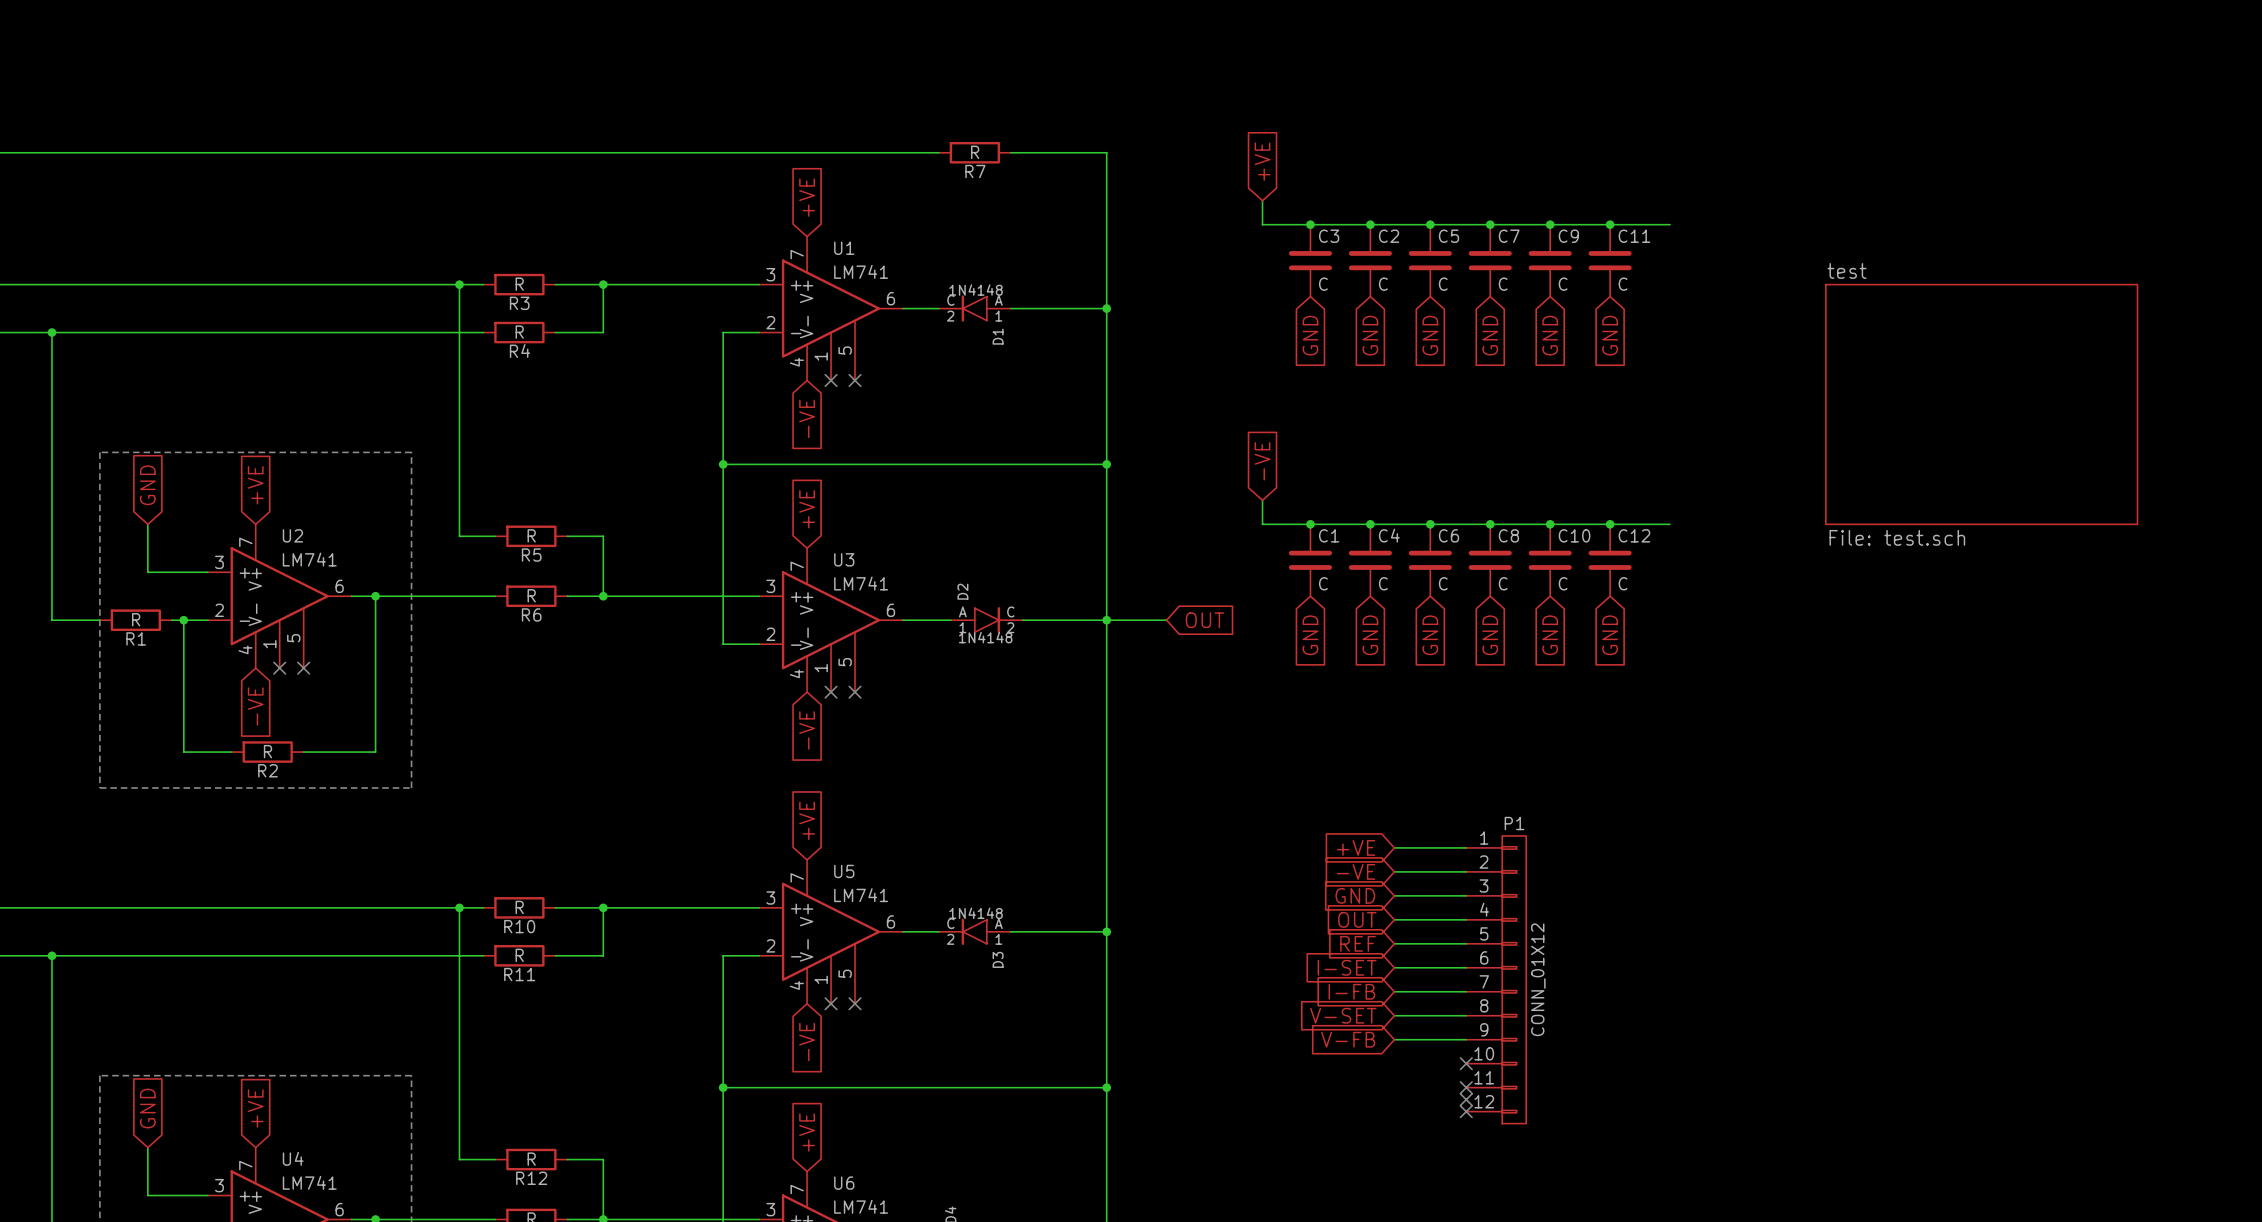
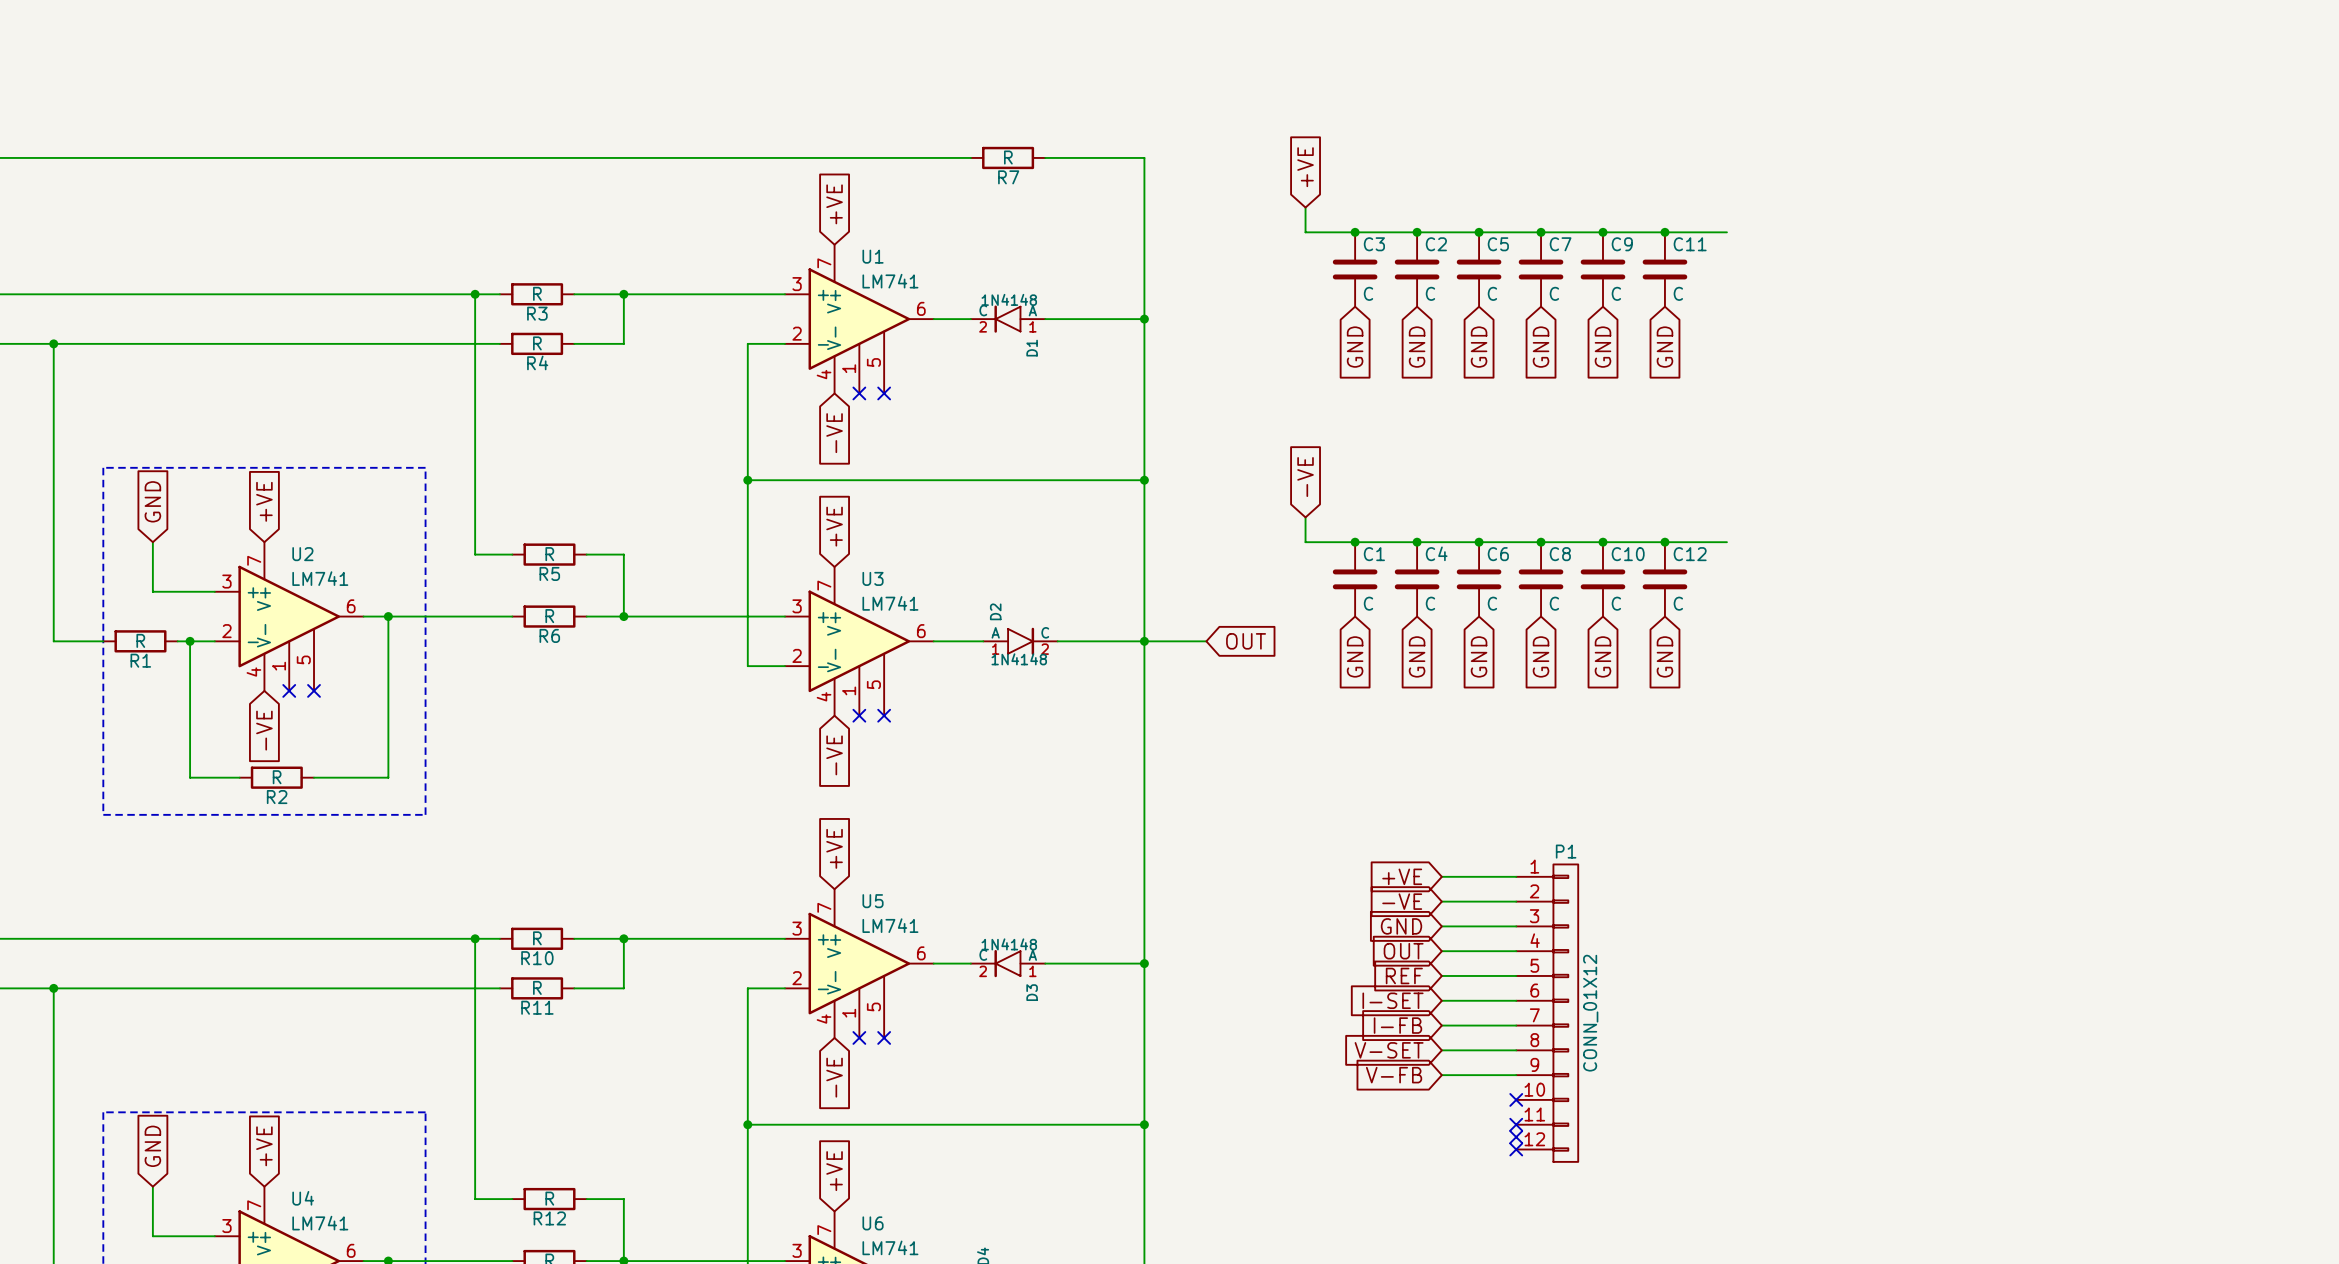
sheet test: File: test.sch (1981, 404) -> none

